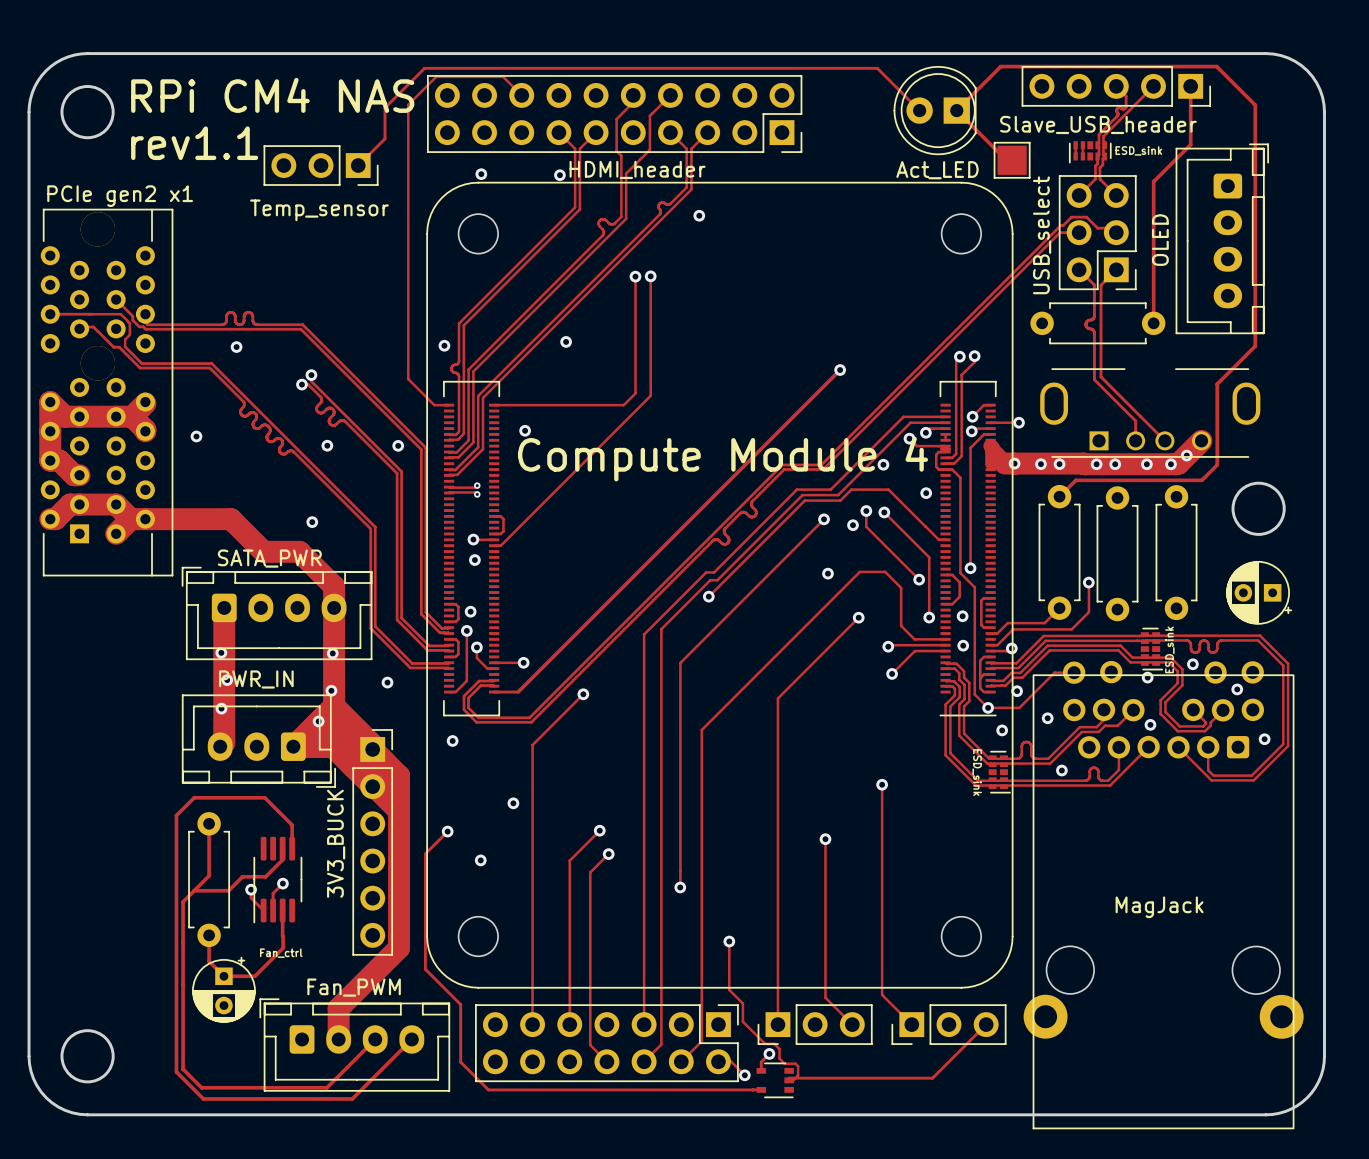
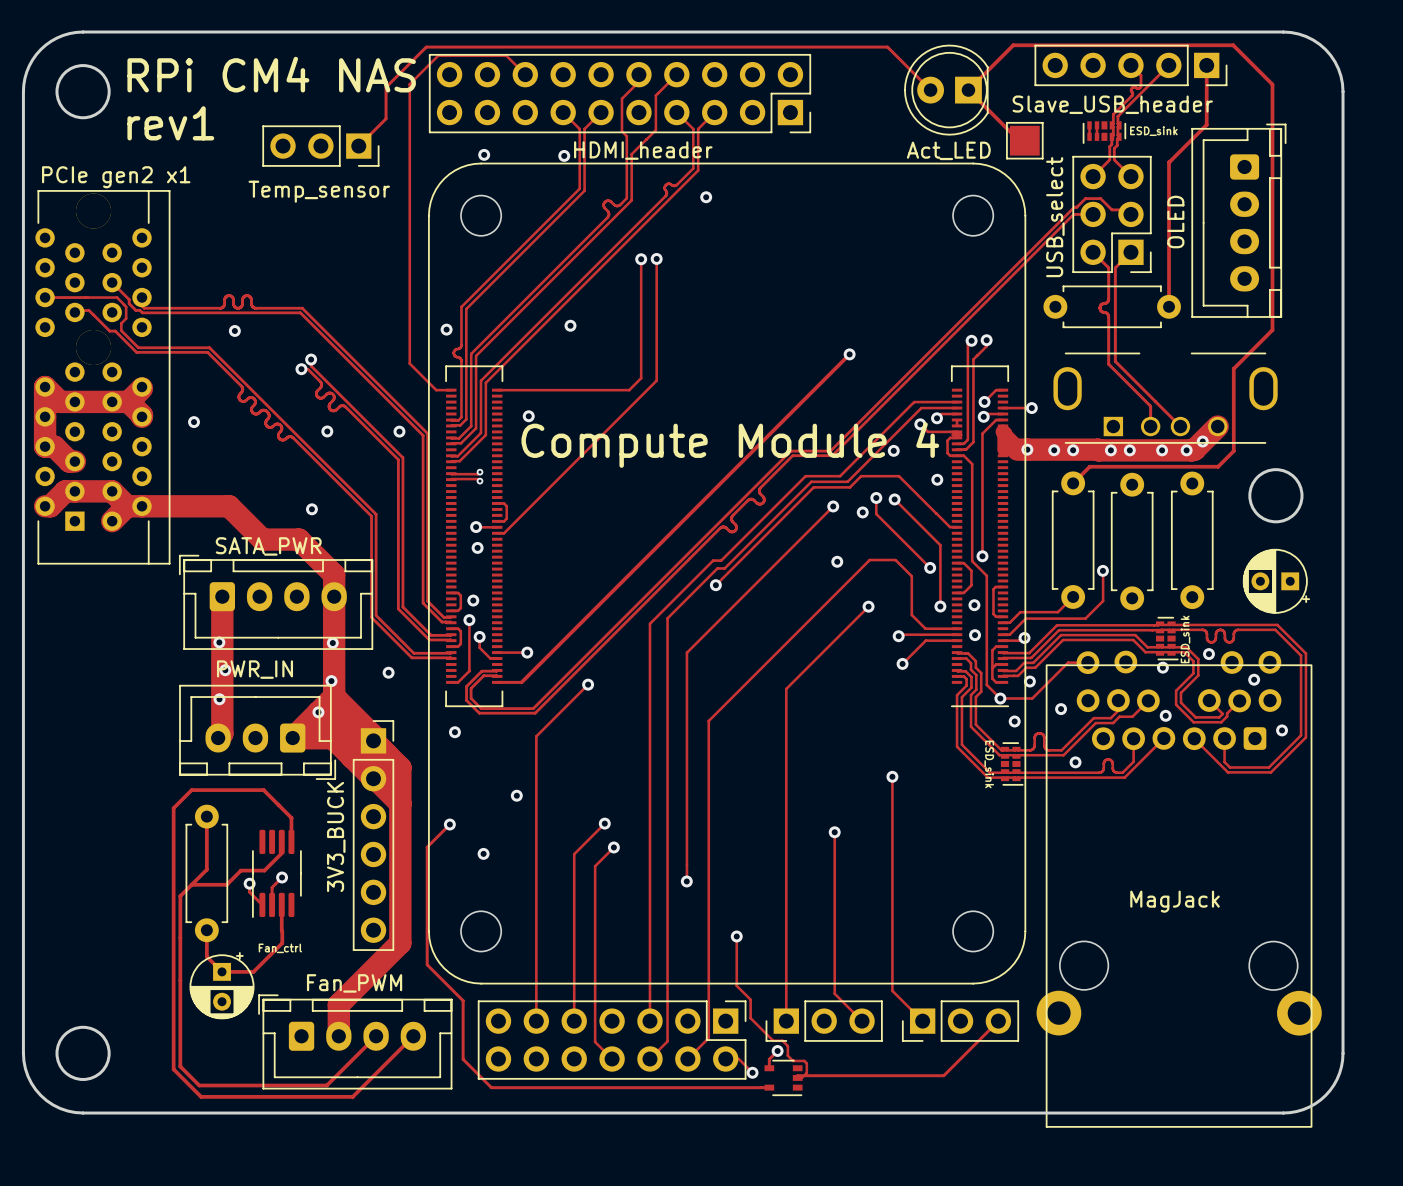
text: rev1.1 (194, 143) -> rev1 (170, 123)

